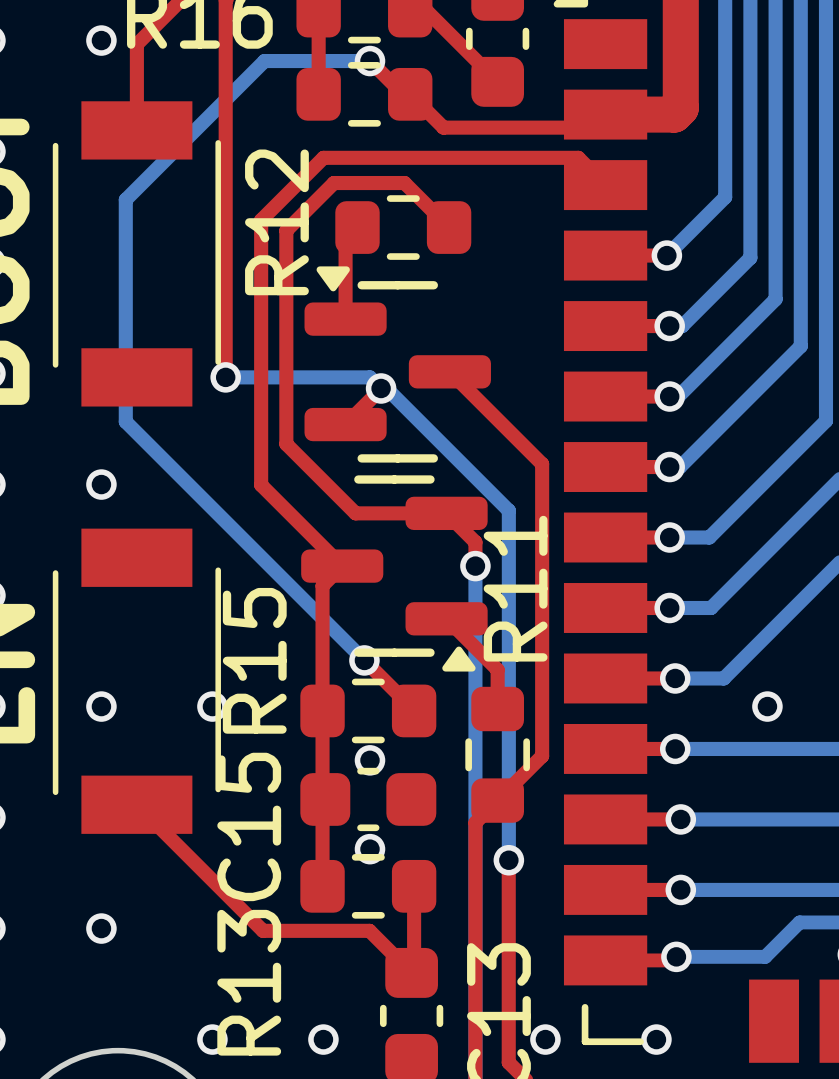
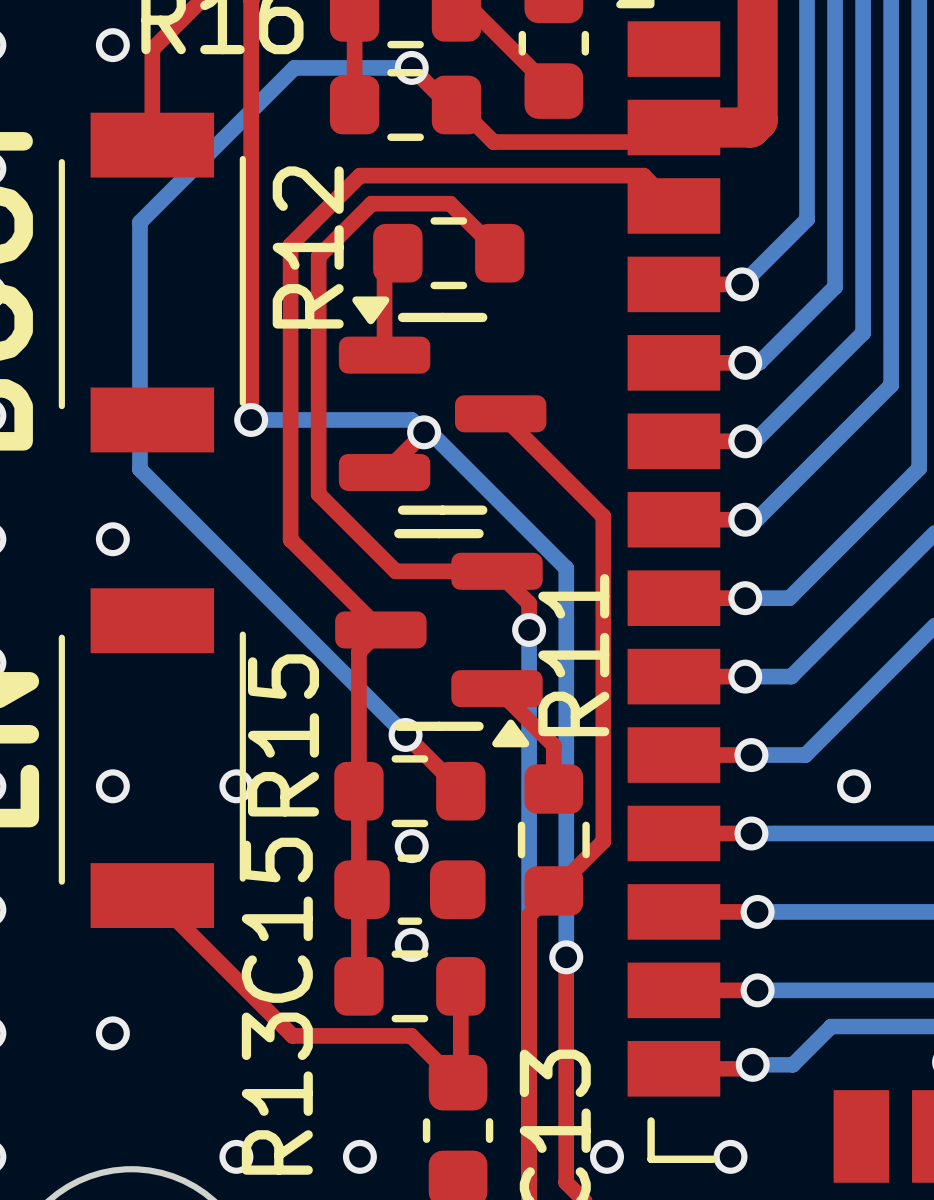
bottom track: (799, 922) (765, 956) (712, 956) -> (889, 1026) (831, 1026) (792, 1064)

